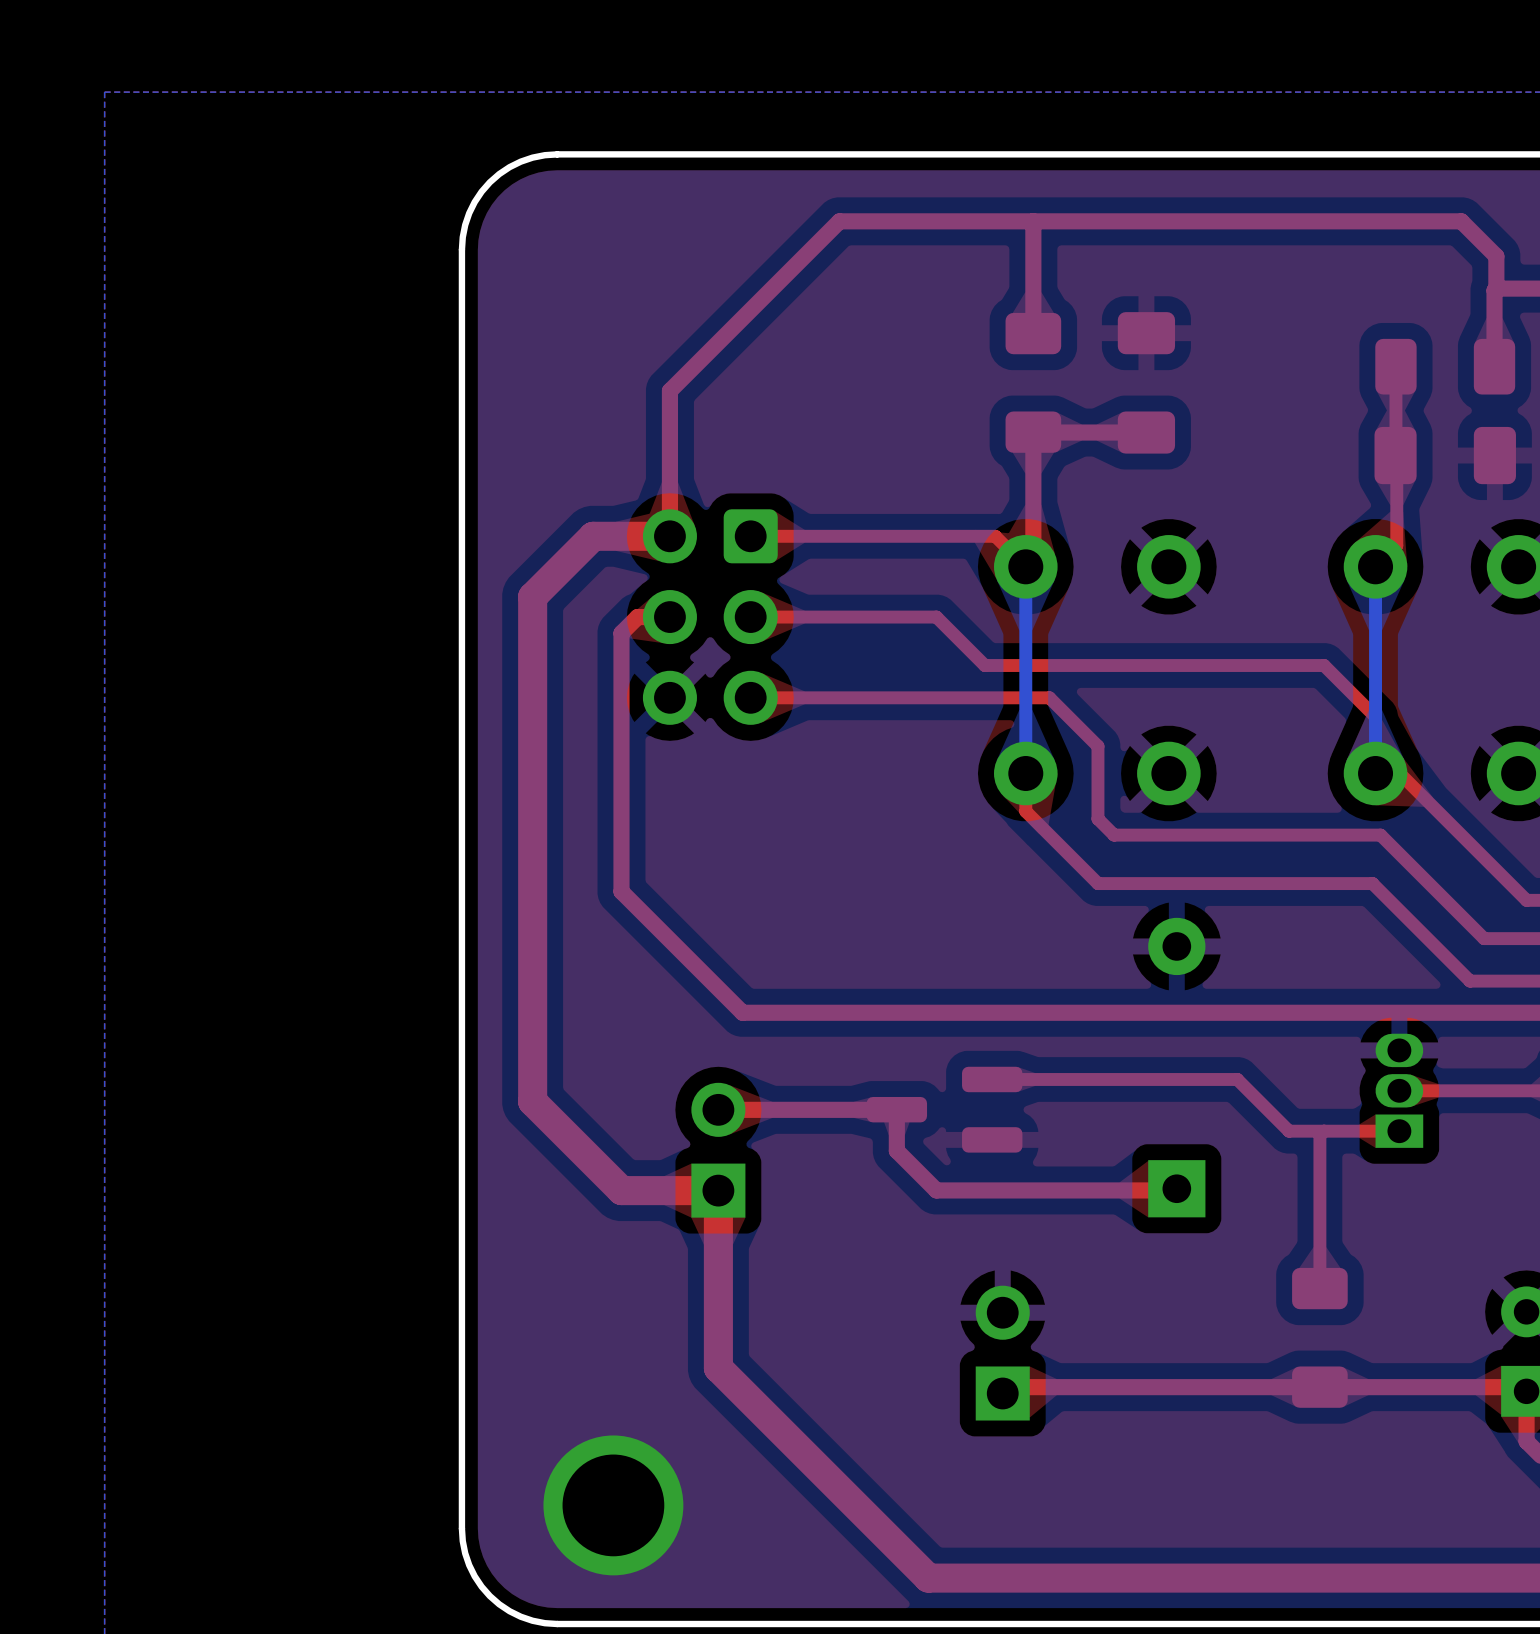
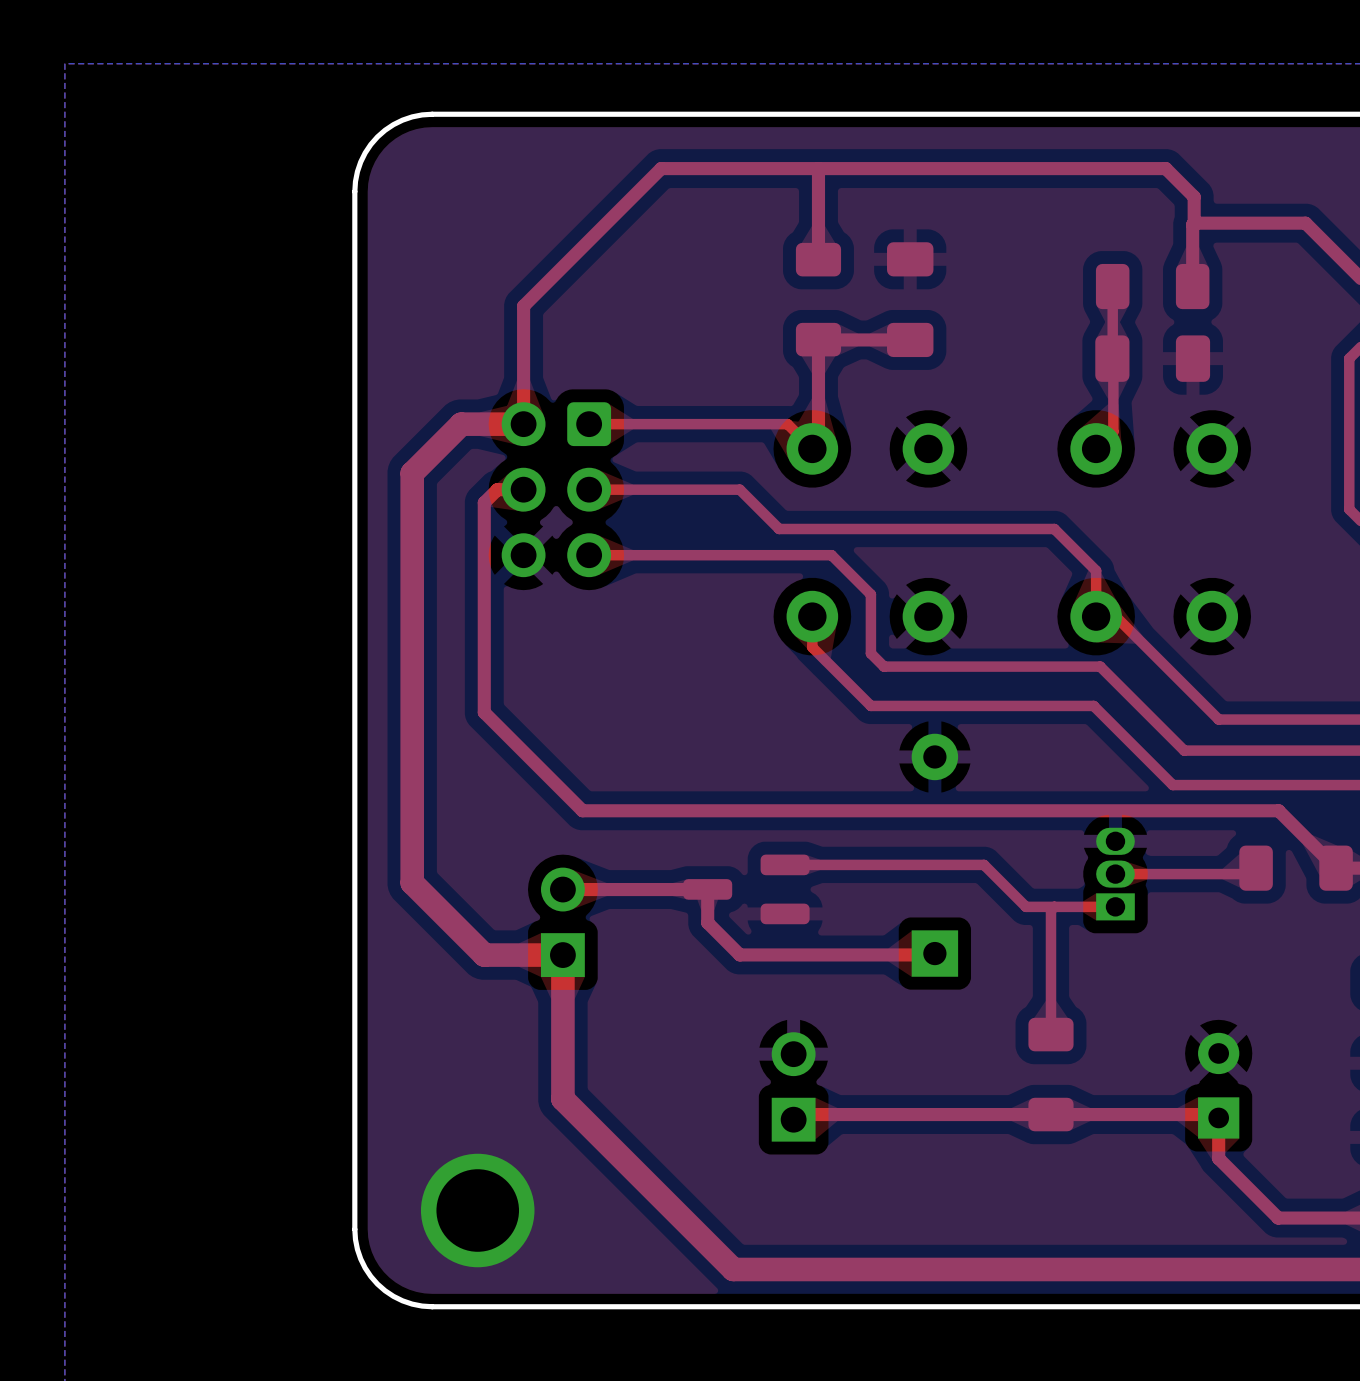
bottom track: (1025, 566) (1025, 773) -> none
bottom track: (1375, 566) (1375, 773) -> none

